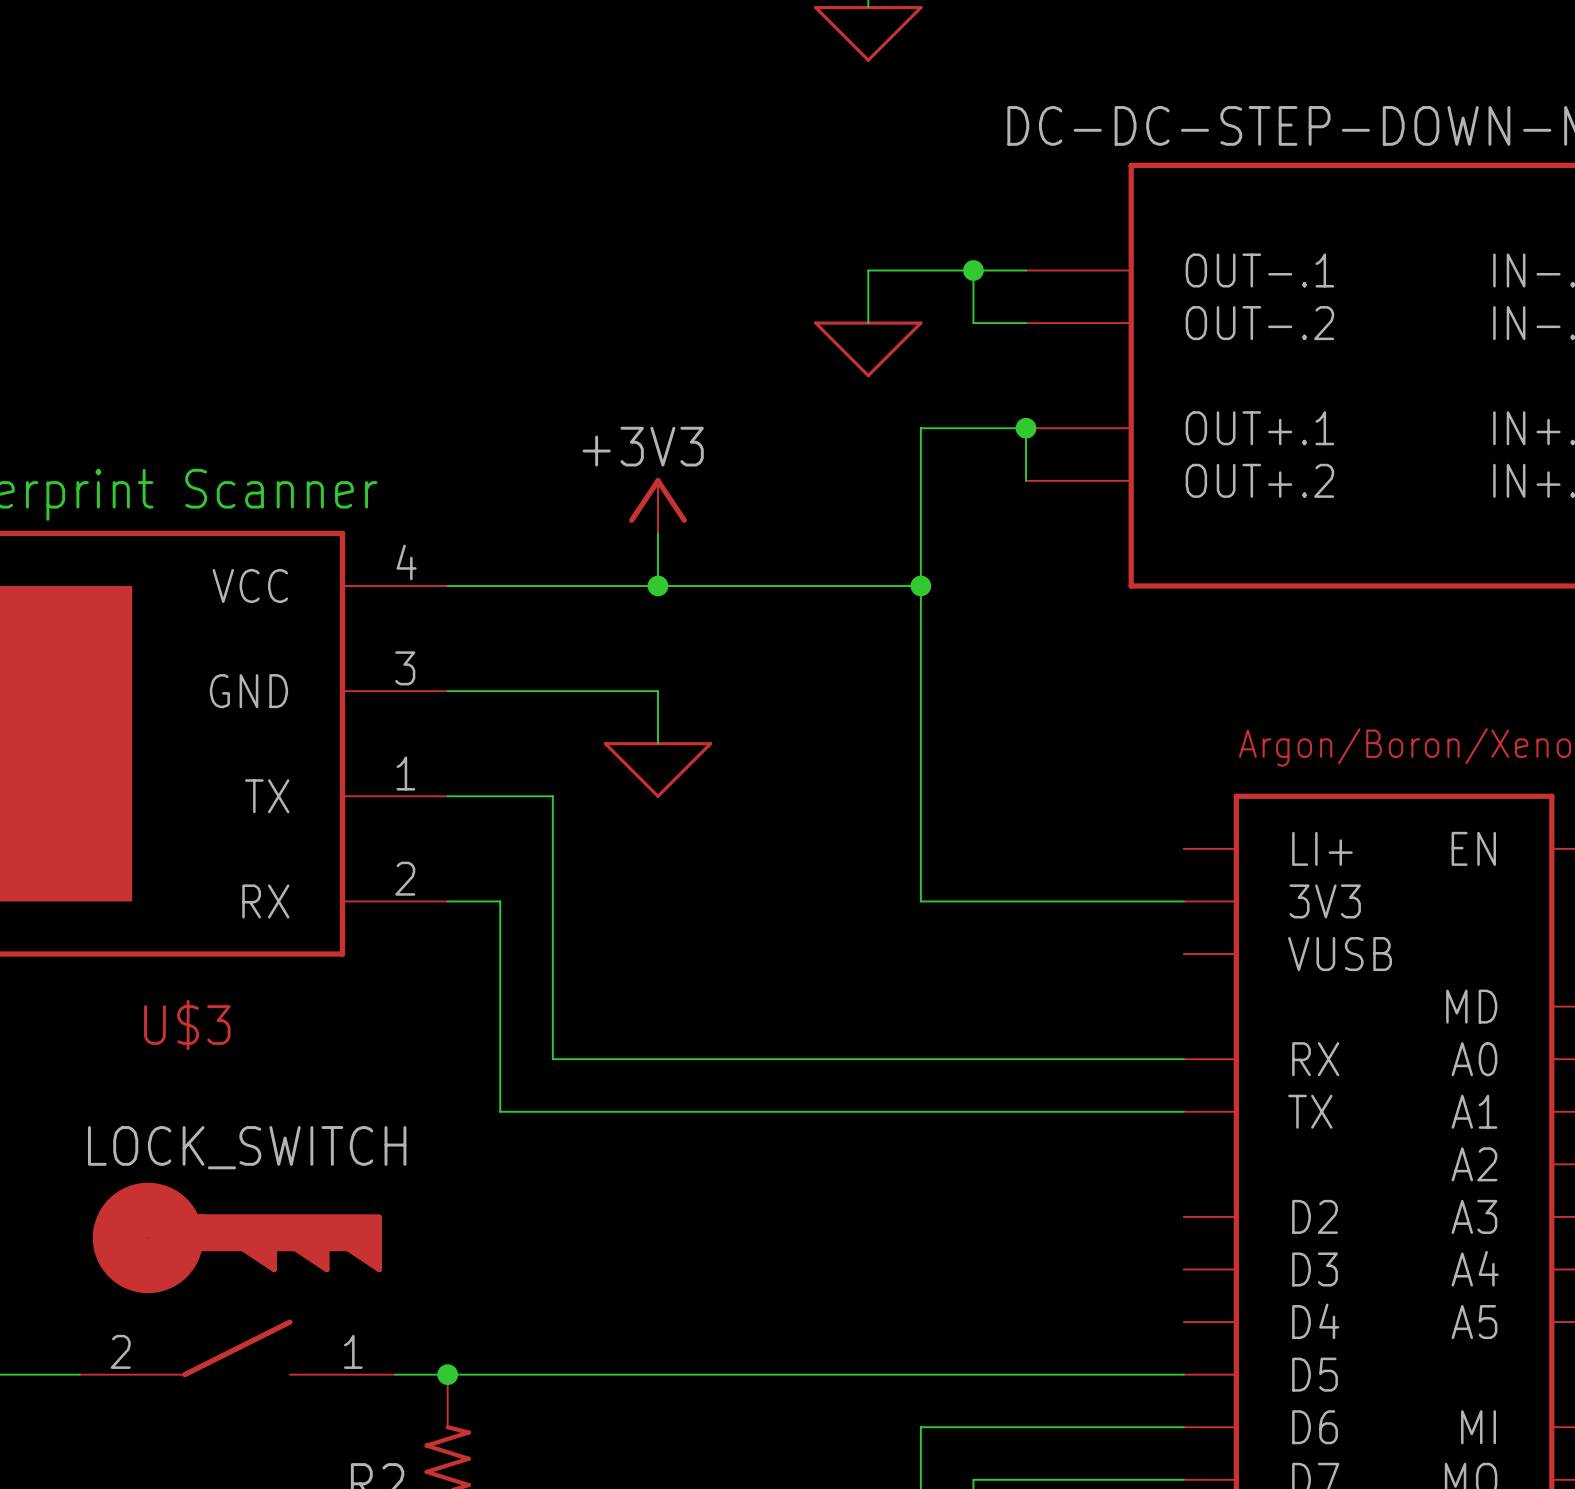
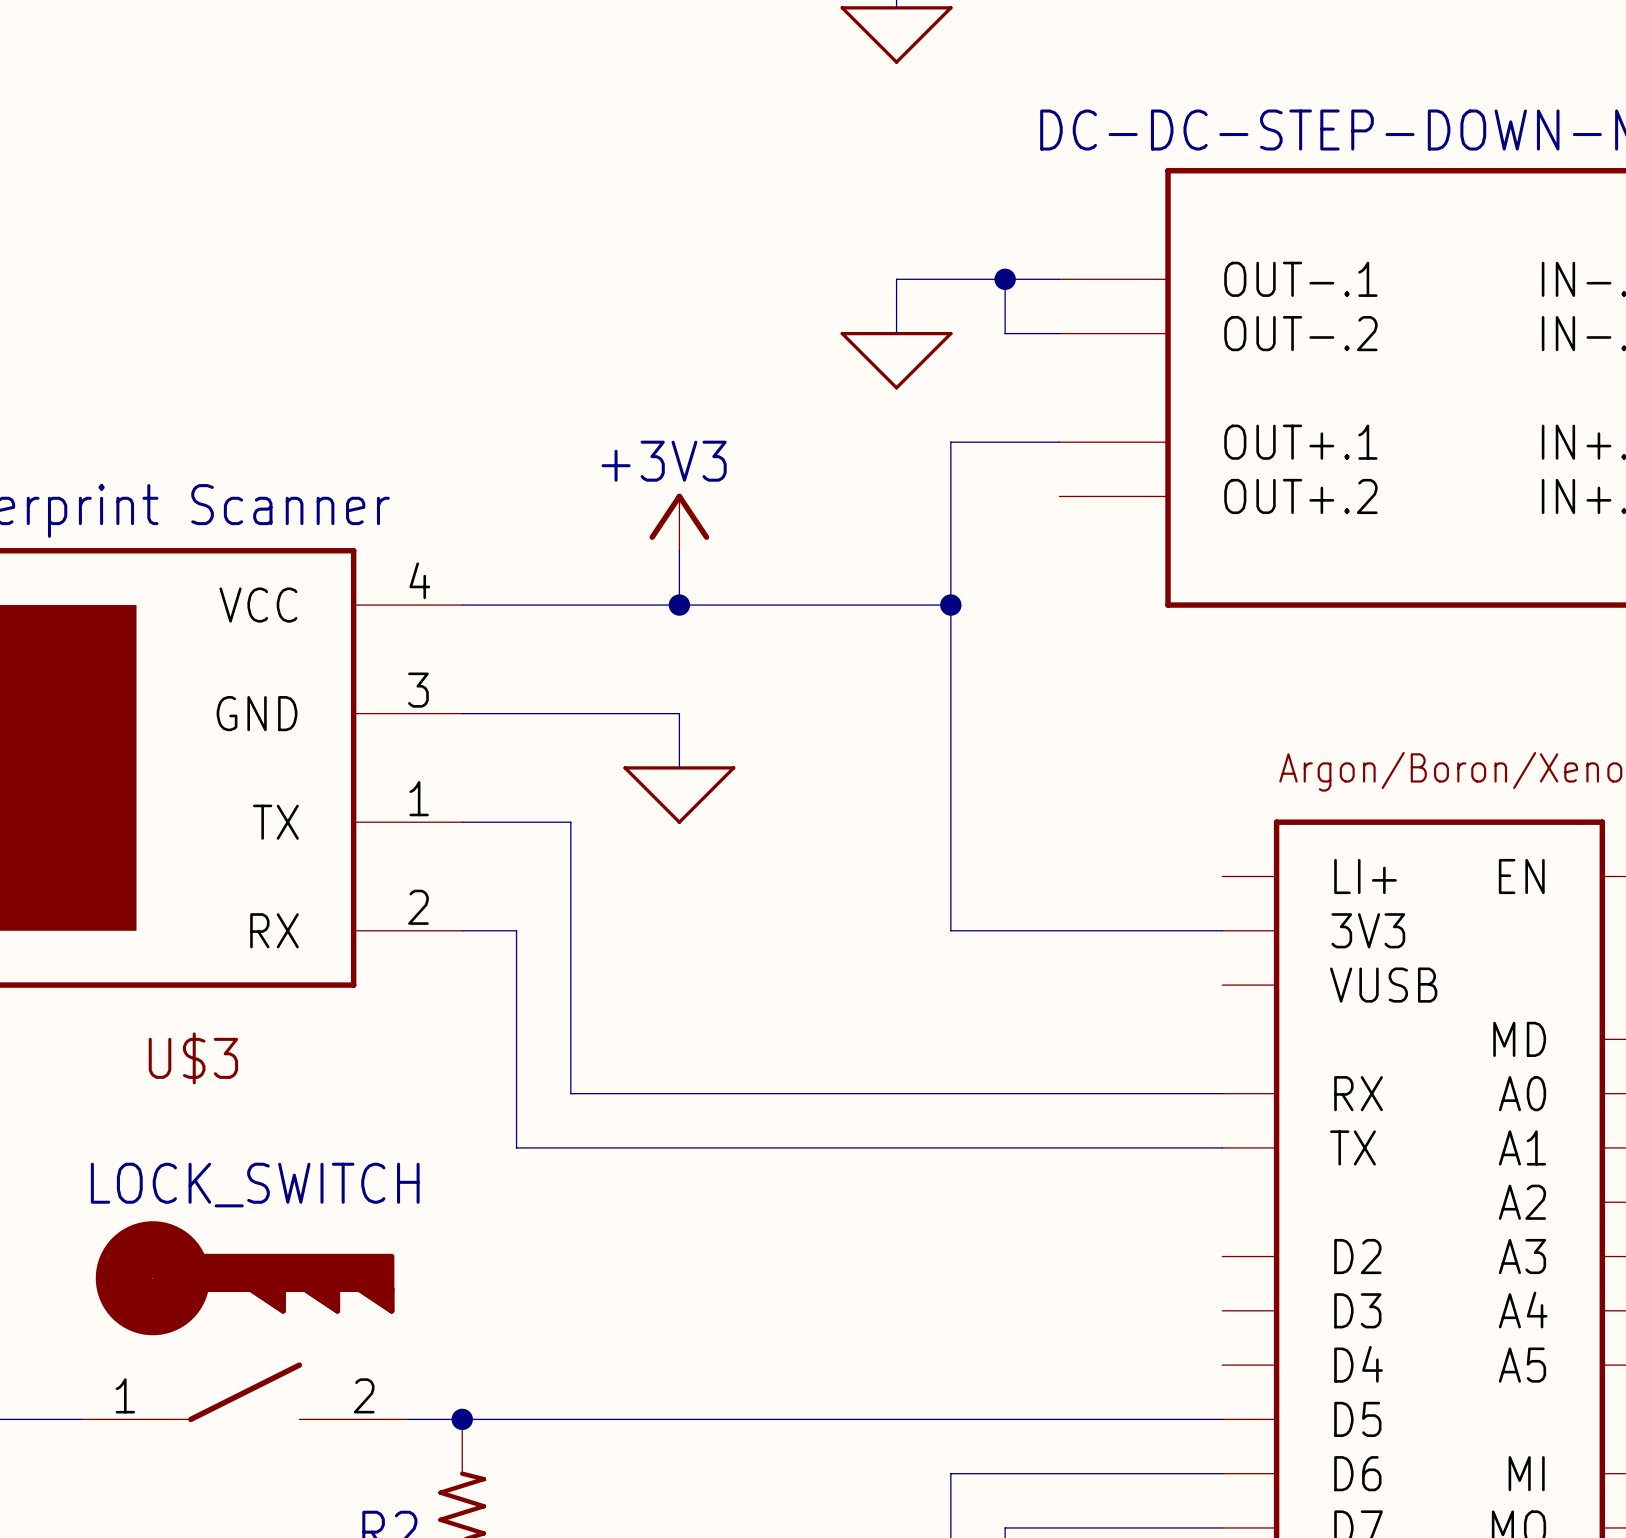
wire: (1026, 428) (1026, 480) -> none
junction: (1026, 428) -> none
LOCK_SWITCH pin number: 2 (120, 1351) -> 1 (125, 1395)
LOCK_SWITCH pin number: 1 (353, 1351) -> 2 (364, 1395)

